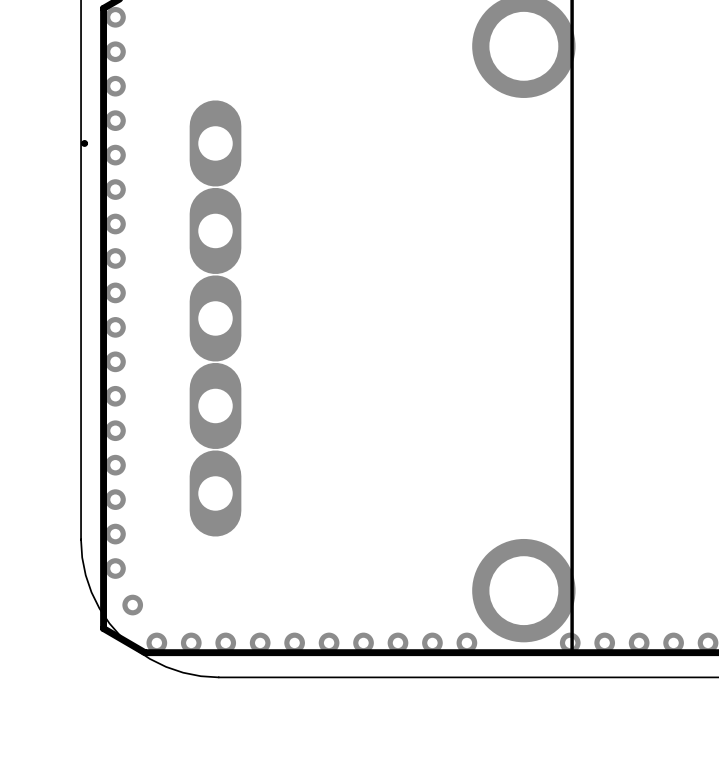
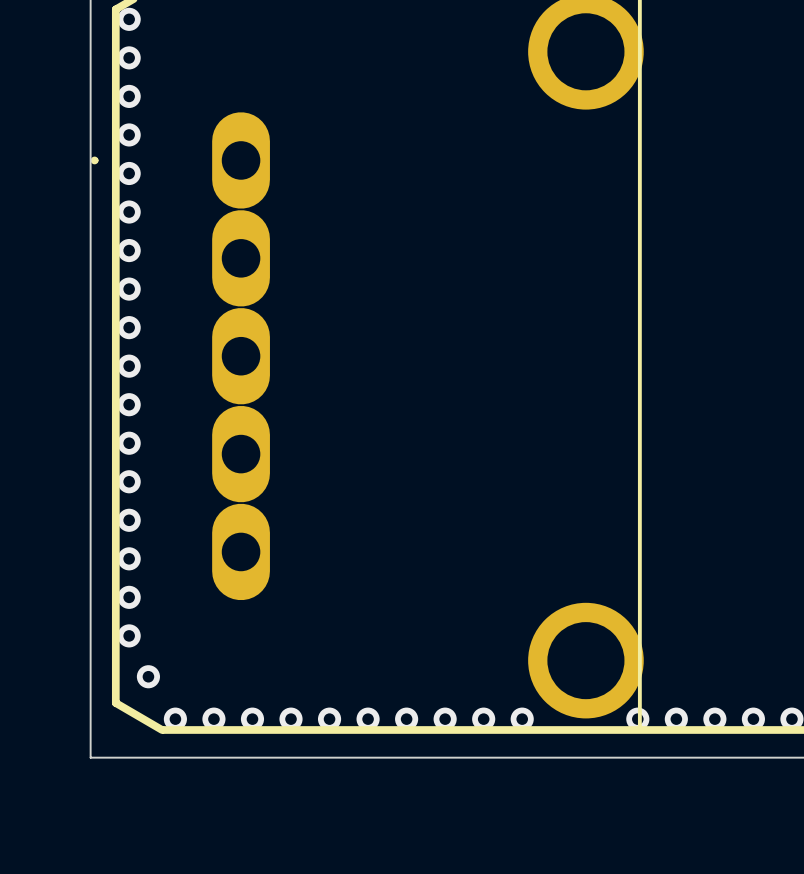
board edge: (81, 539) (82, 557) (91, 592) (109, 623) (121, 637) (134, 648) (166, 666) (200, 676) (218, 677) -> (90, 603) (90, 757) (244, 757)

